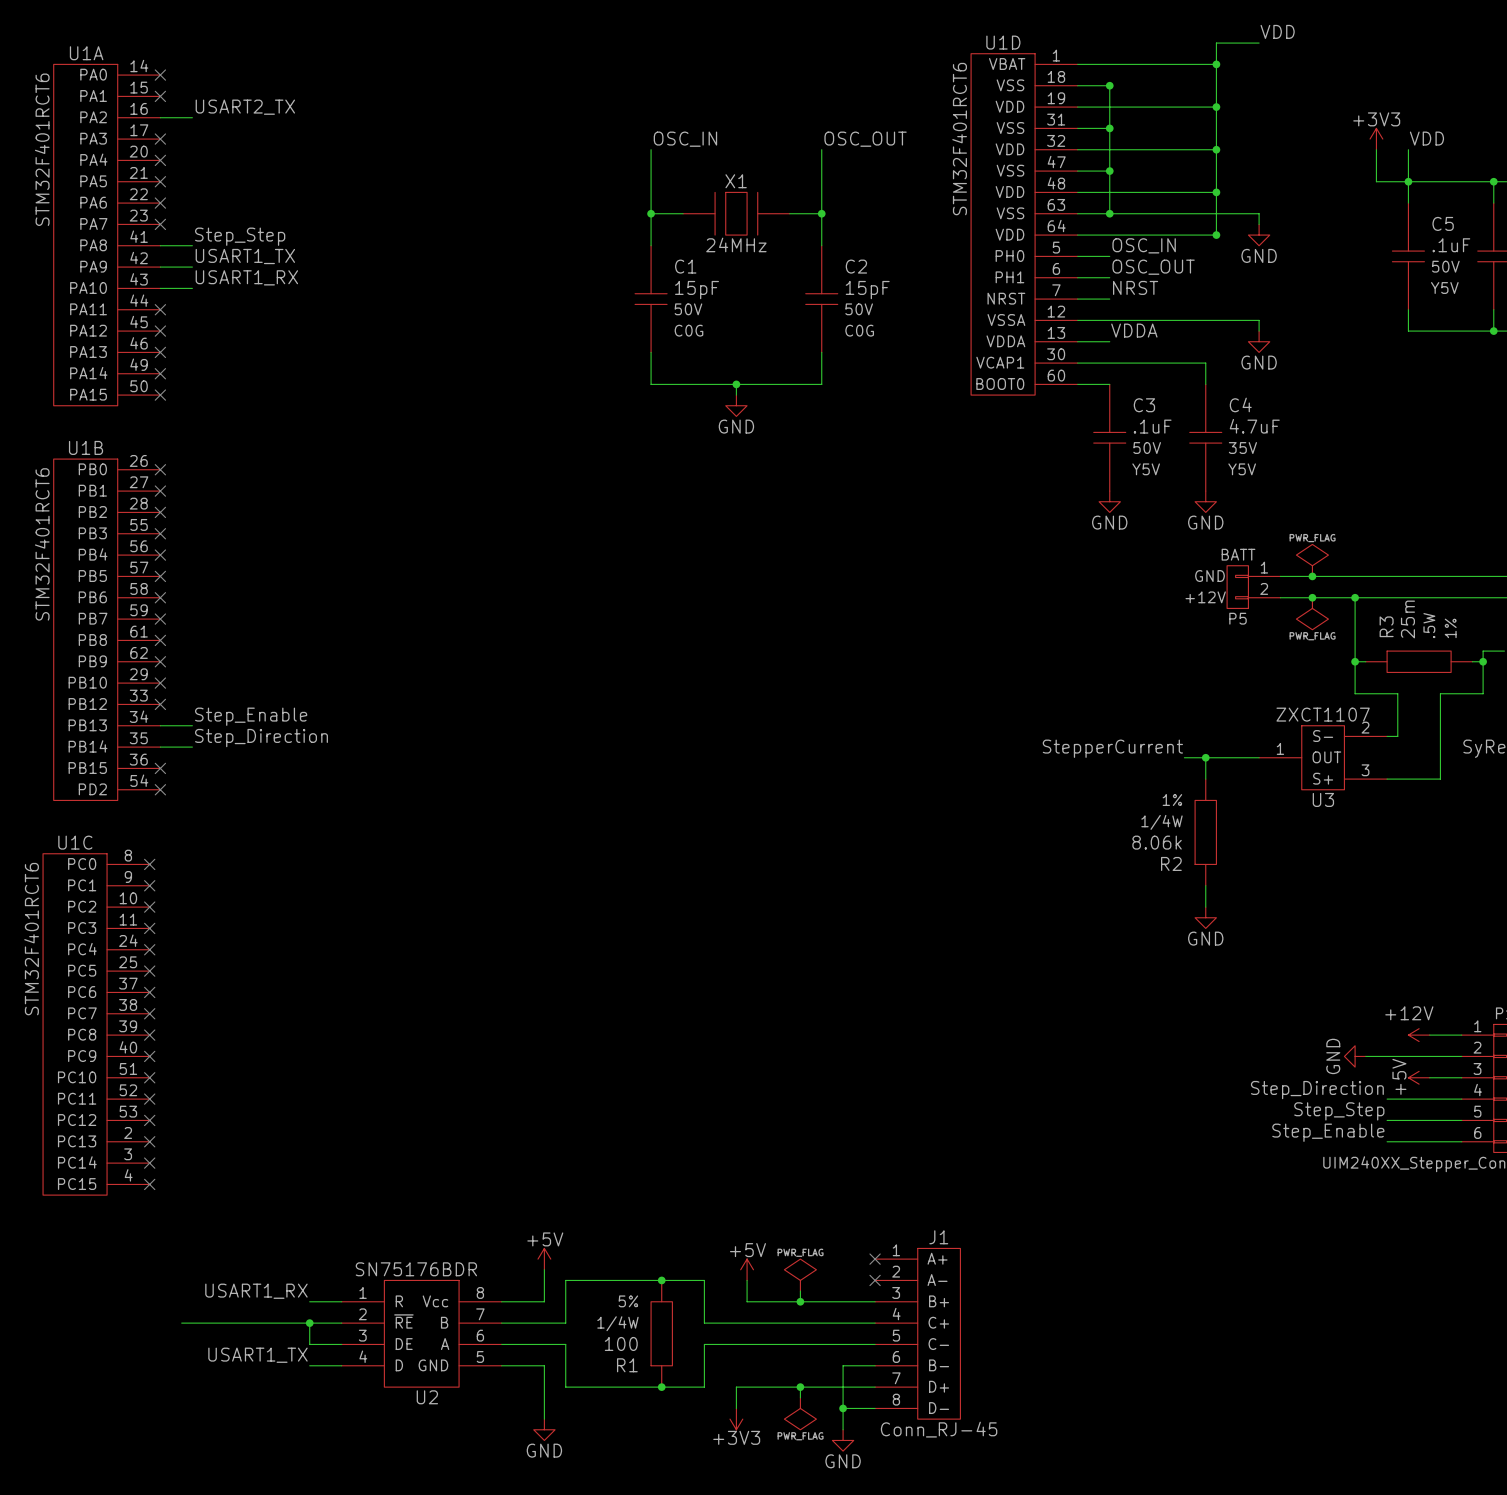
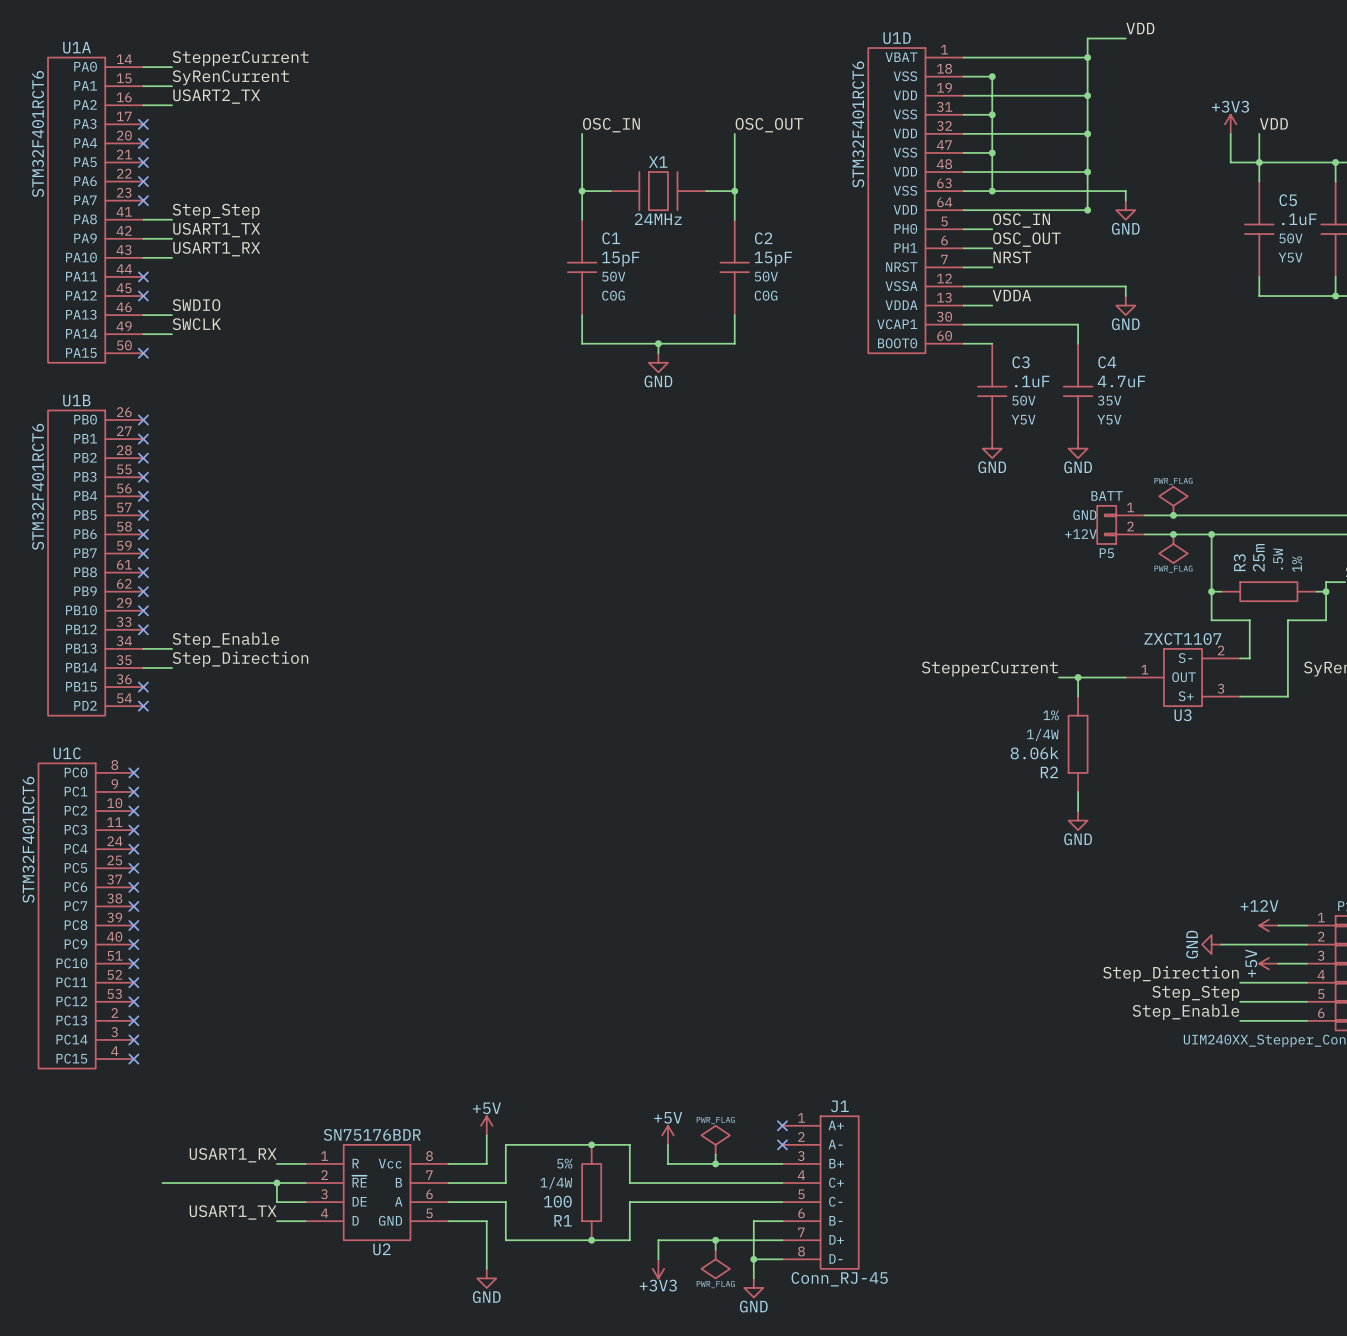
label: none -> StepperCurrent (240, 58)
wire: none -> (143, 67) (172, 67)
no-connect mark: (160, 75) -> none
label: none -> SyRenCurrent (230, 77)
wire: none -> (143, 86) (172, 86)
no-connect mark: (160, 96) -> none
label: none -> SWDIO (196, 305)
wire: none -> (143, 315) (172, 315)
no-connect mark: (160, 352) -> none
label: none -> SWCLK (196, 324)
wire: none -> (143, 334) (172, 334)
no-connect mark: (160, 373) -> none

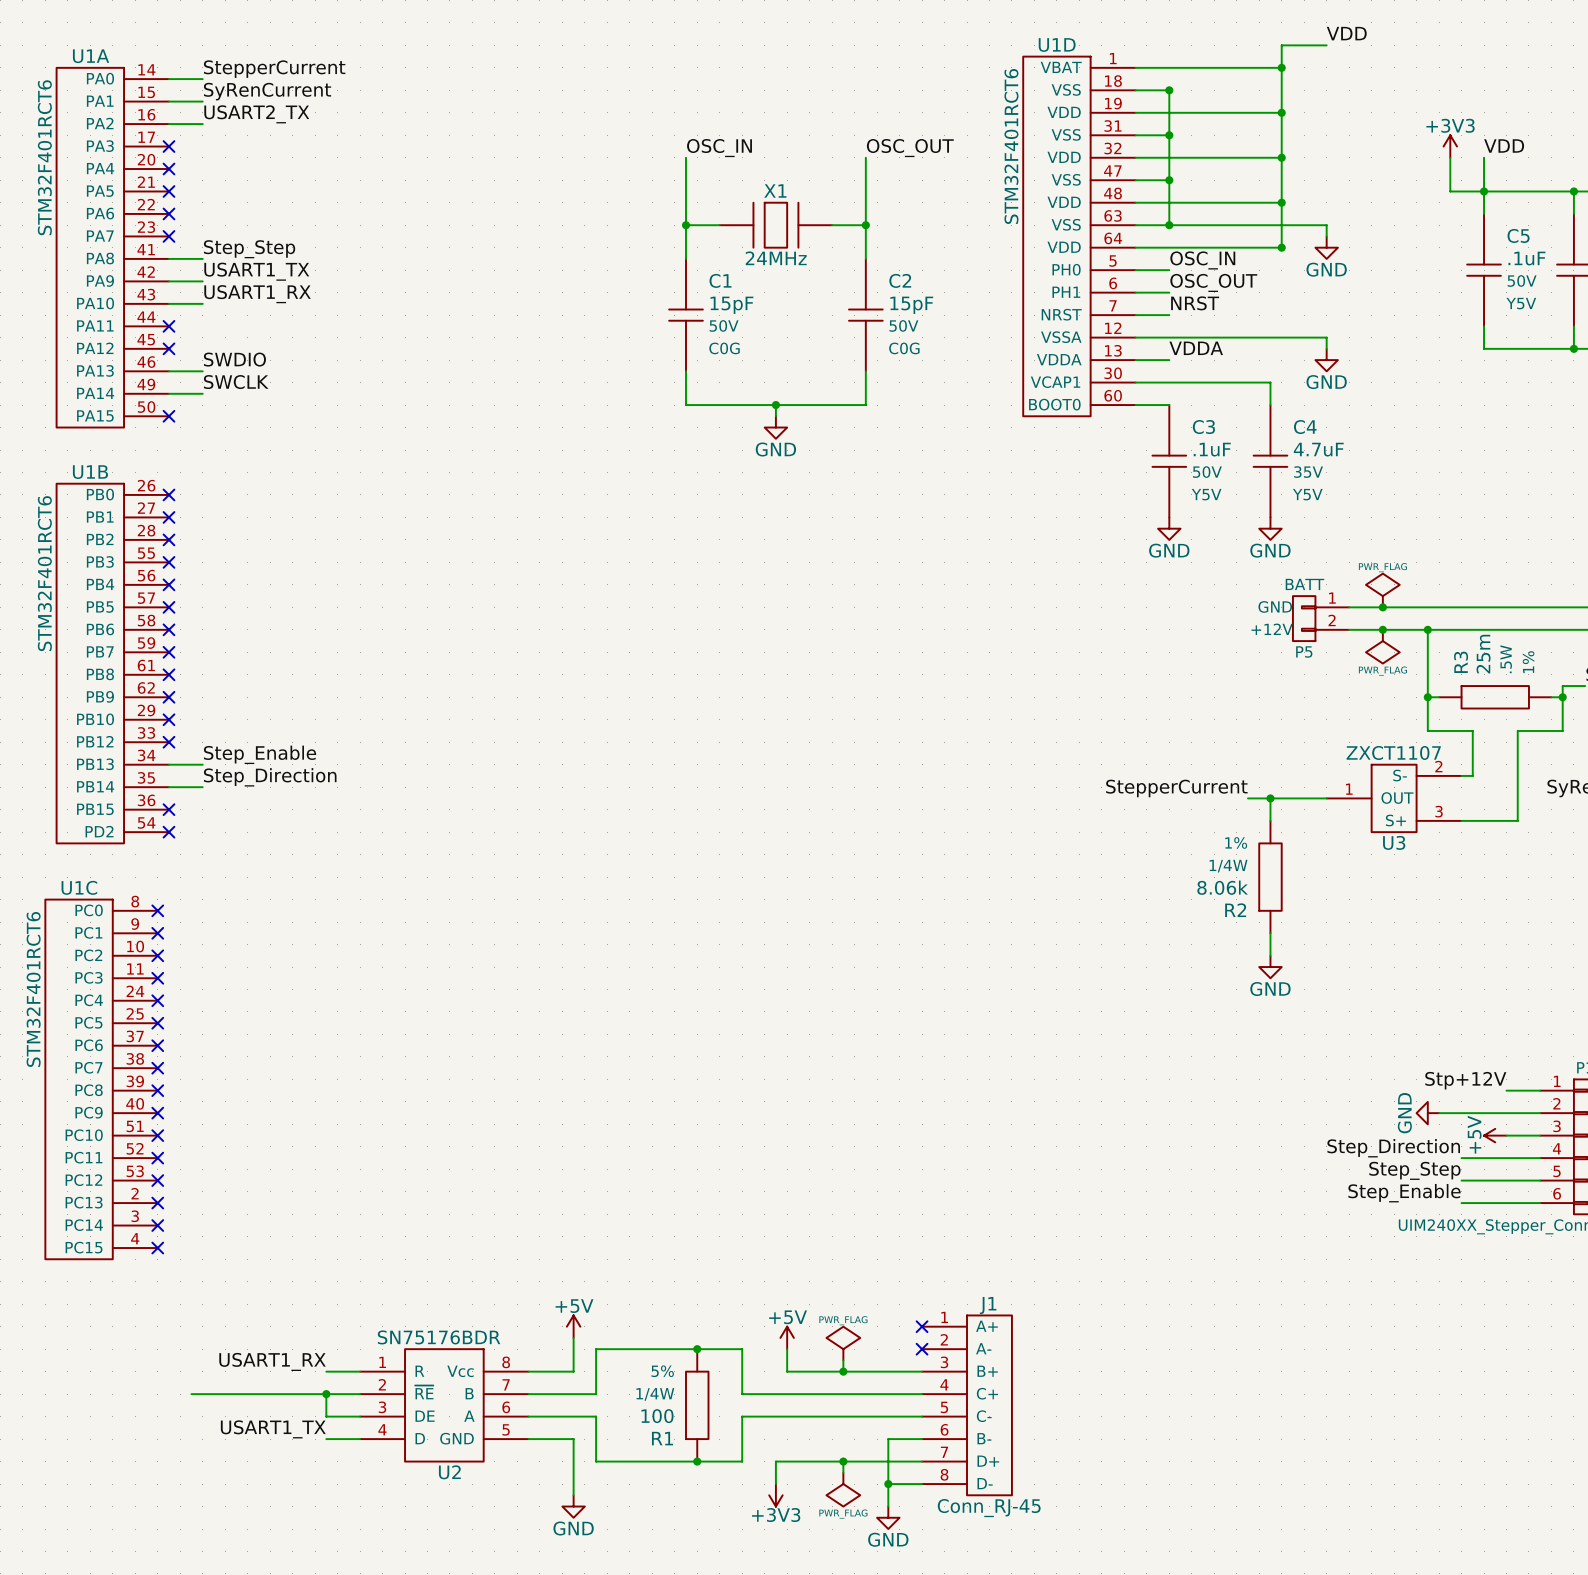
label: none -> Stp+12V (1465, 1080)
power symbol: +12V (1268, 925) -> none

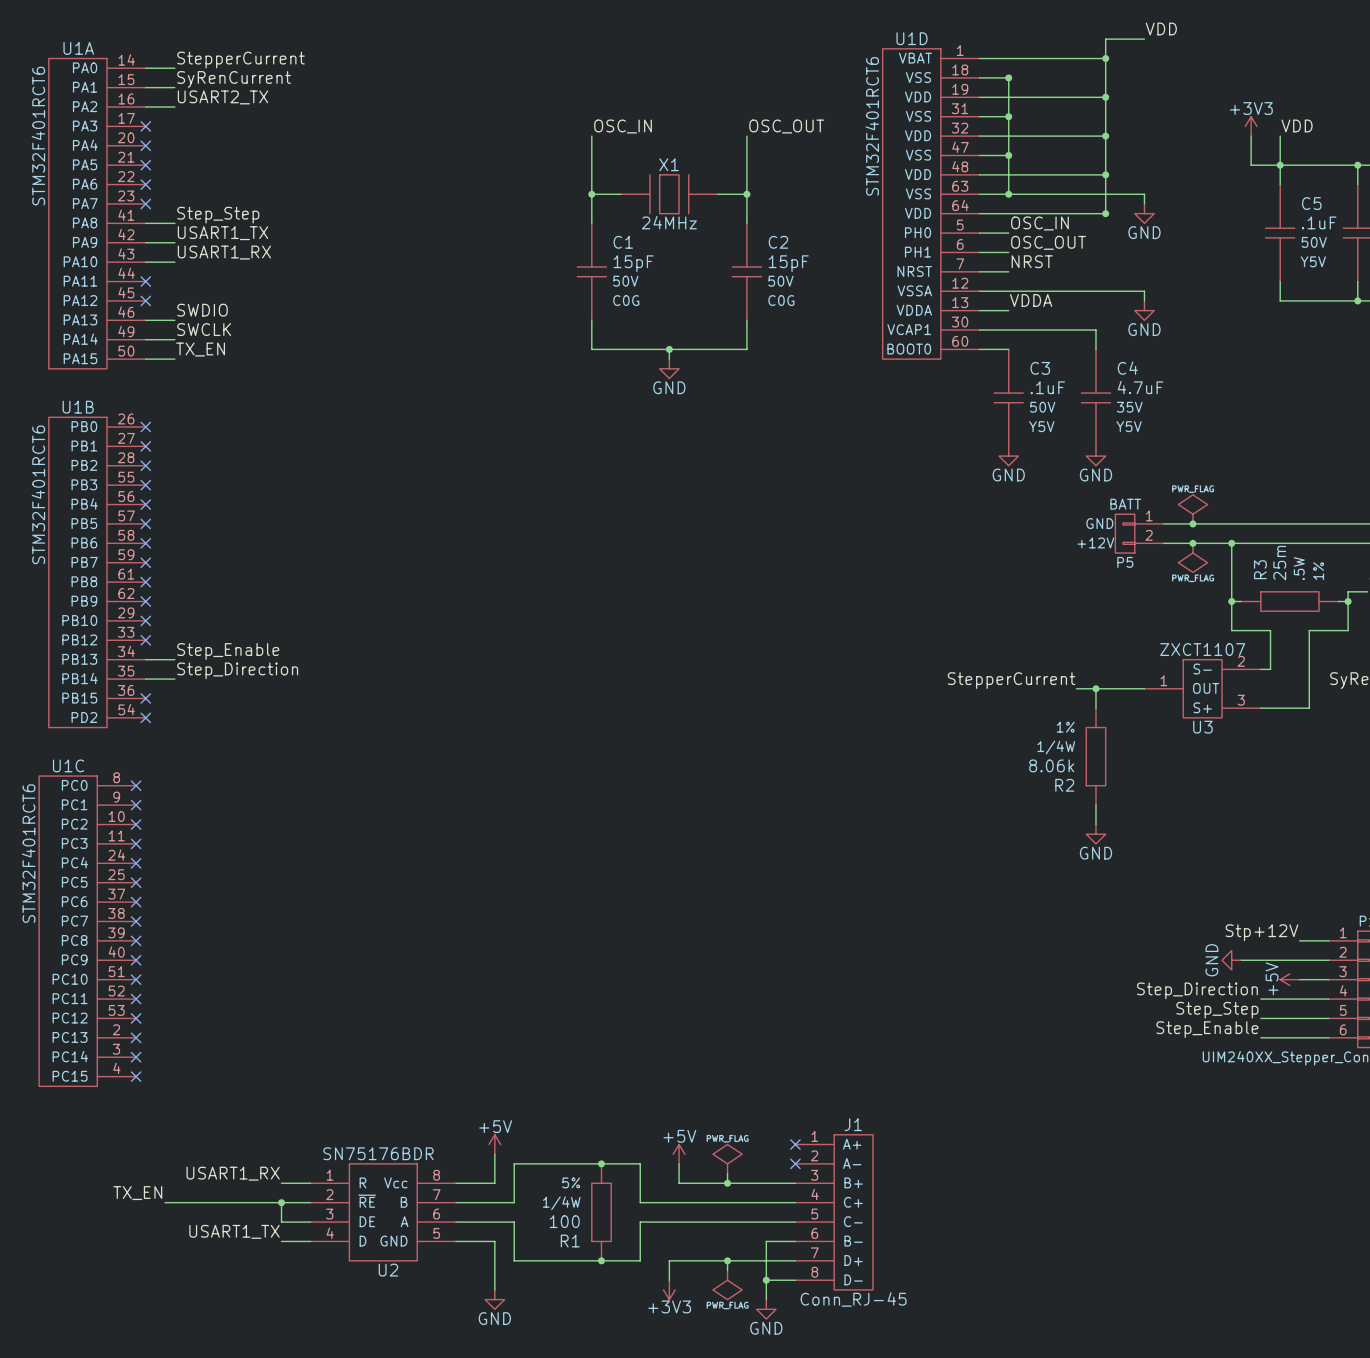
label: none -> TX_EN (200, 349)
wire: none -> (145, 359) (174, 359)
no-connect mark: (168, 416) -> none
label: none -> TX_EN (137, 1193)

